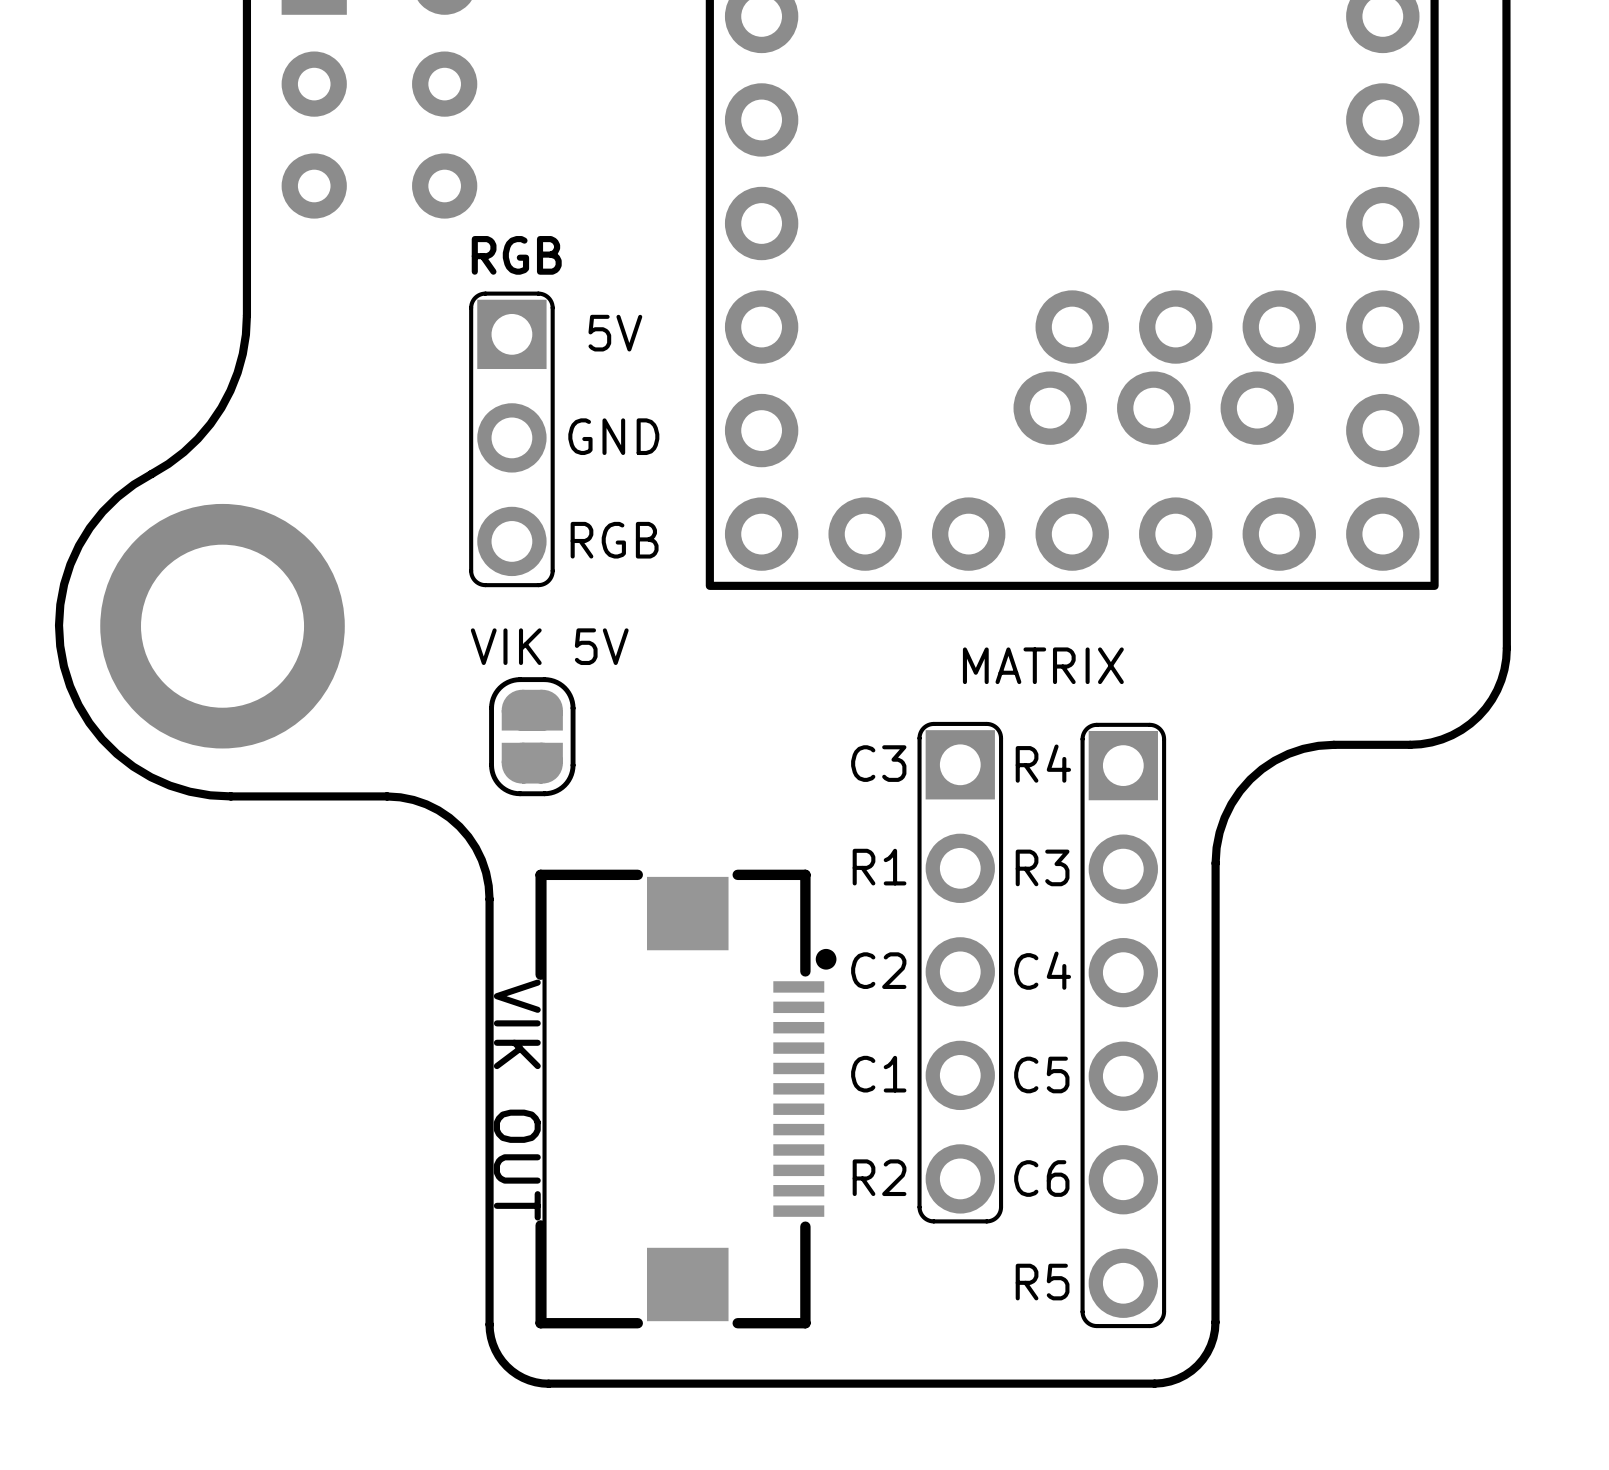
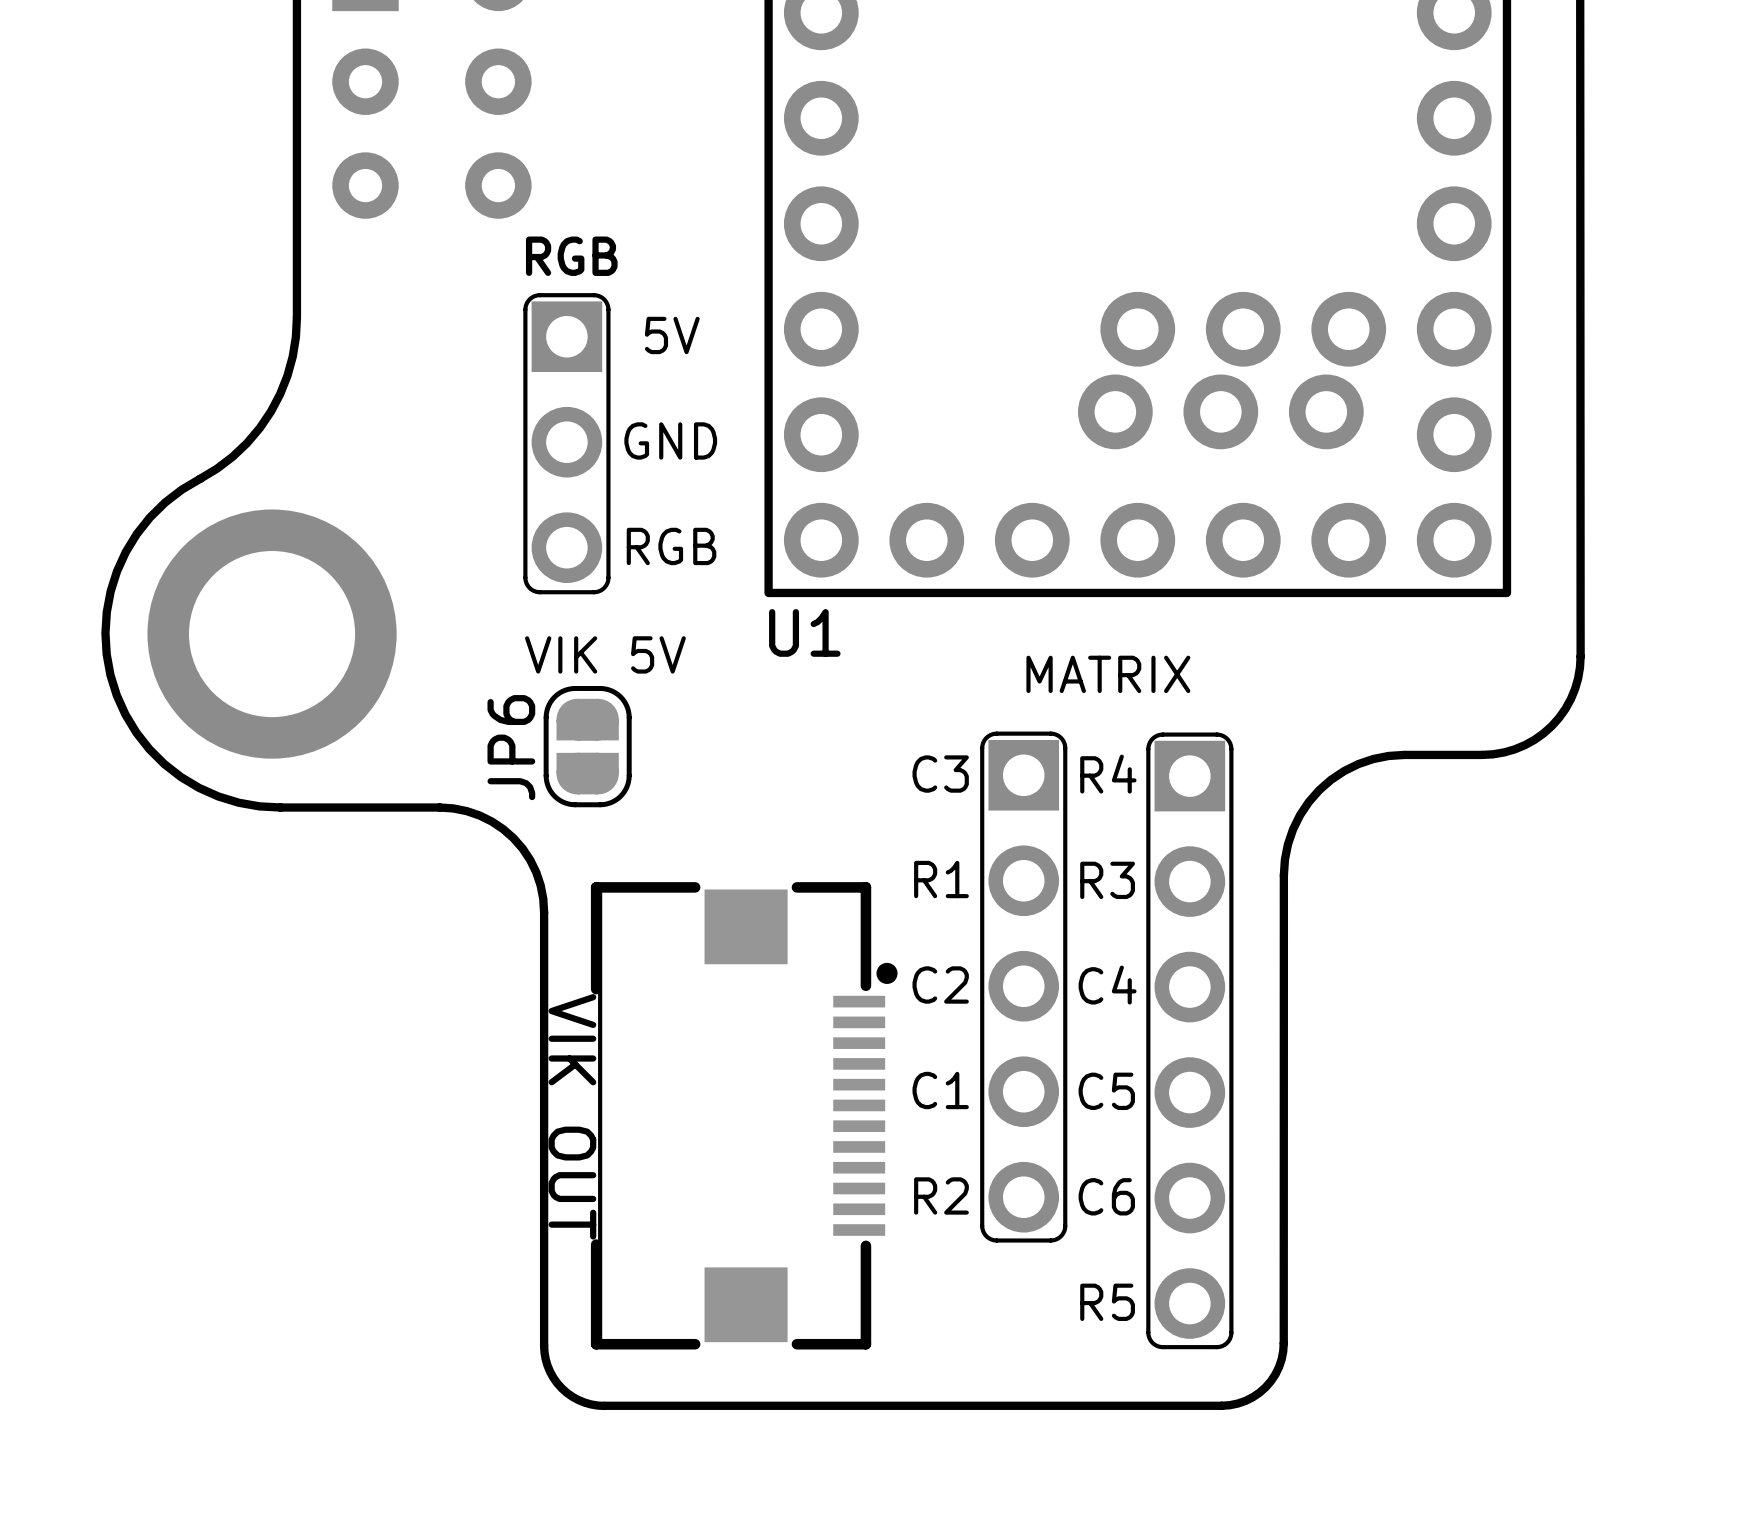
U1 name: none -> U1 (804, 632)
JP6 name: none -> JP6 (511, 747)

